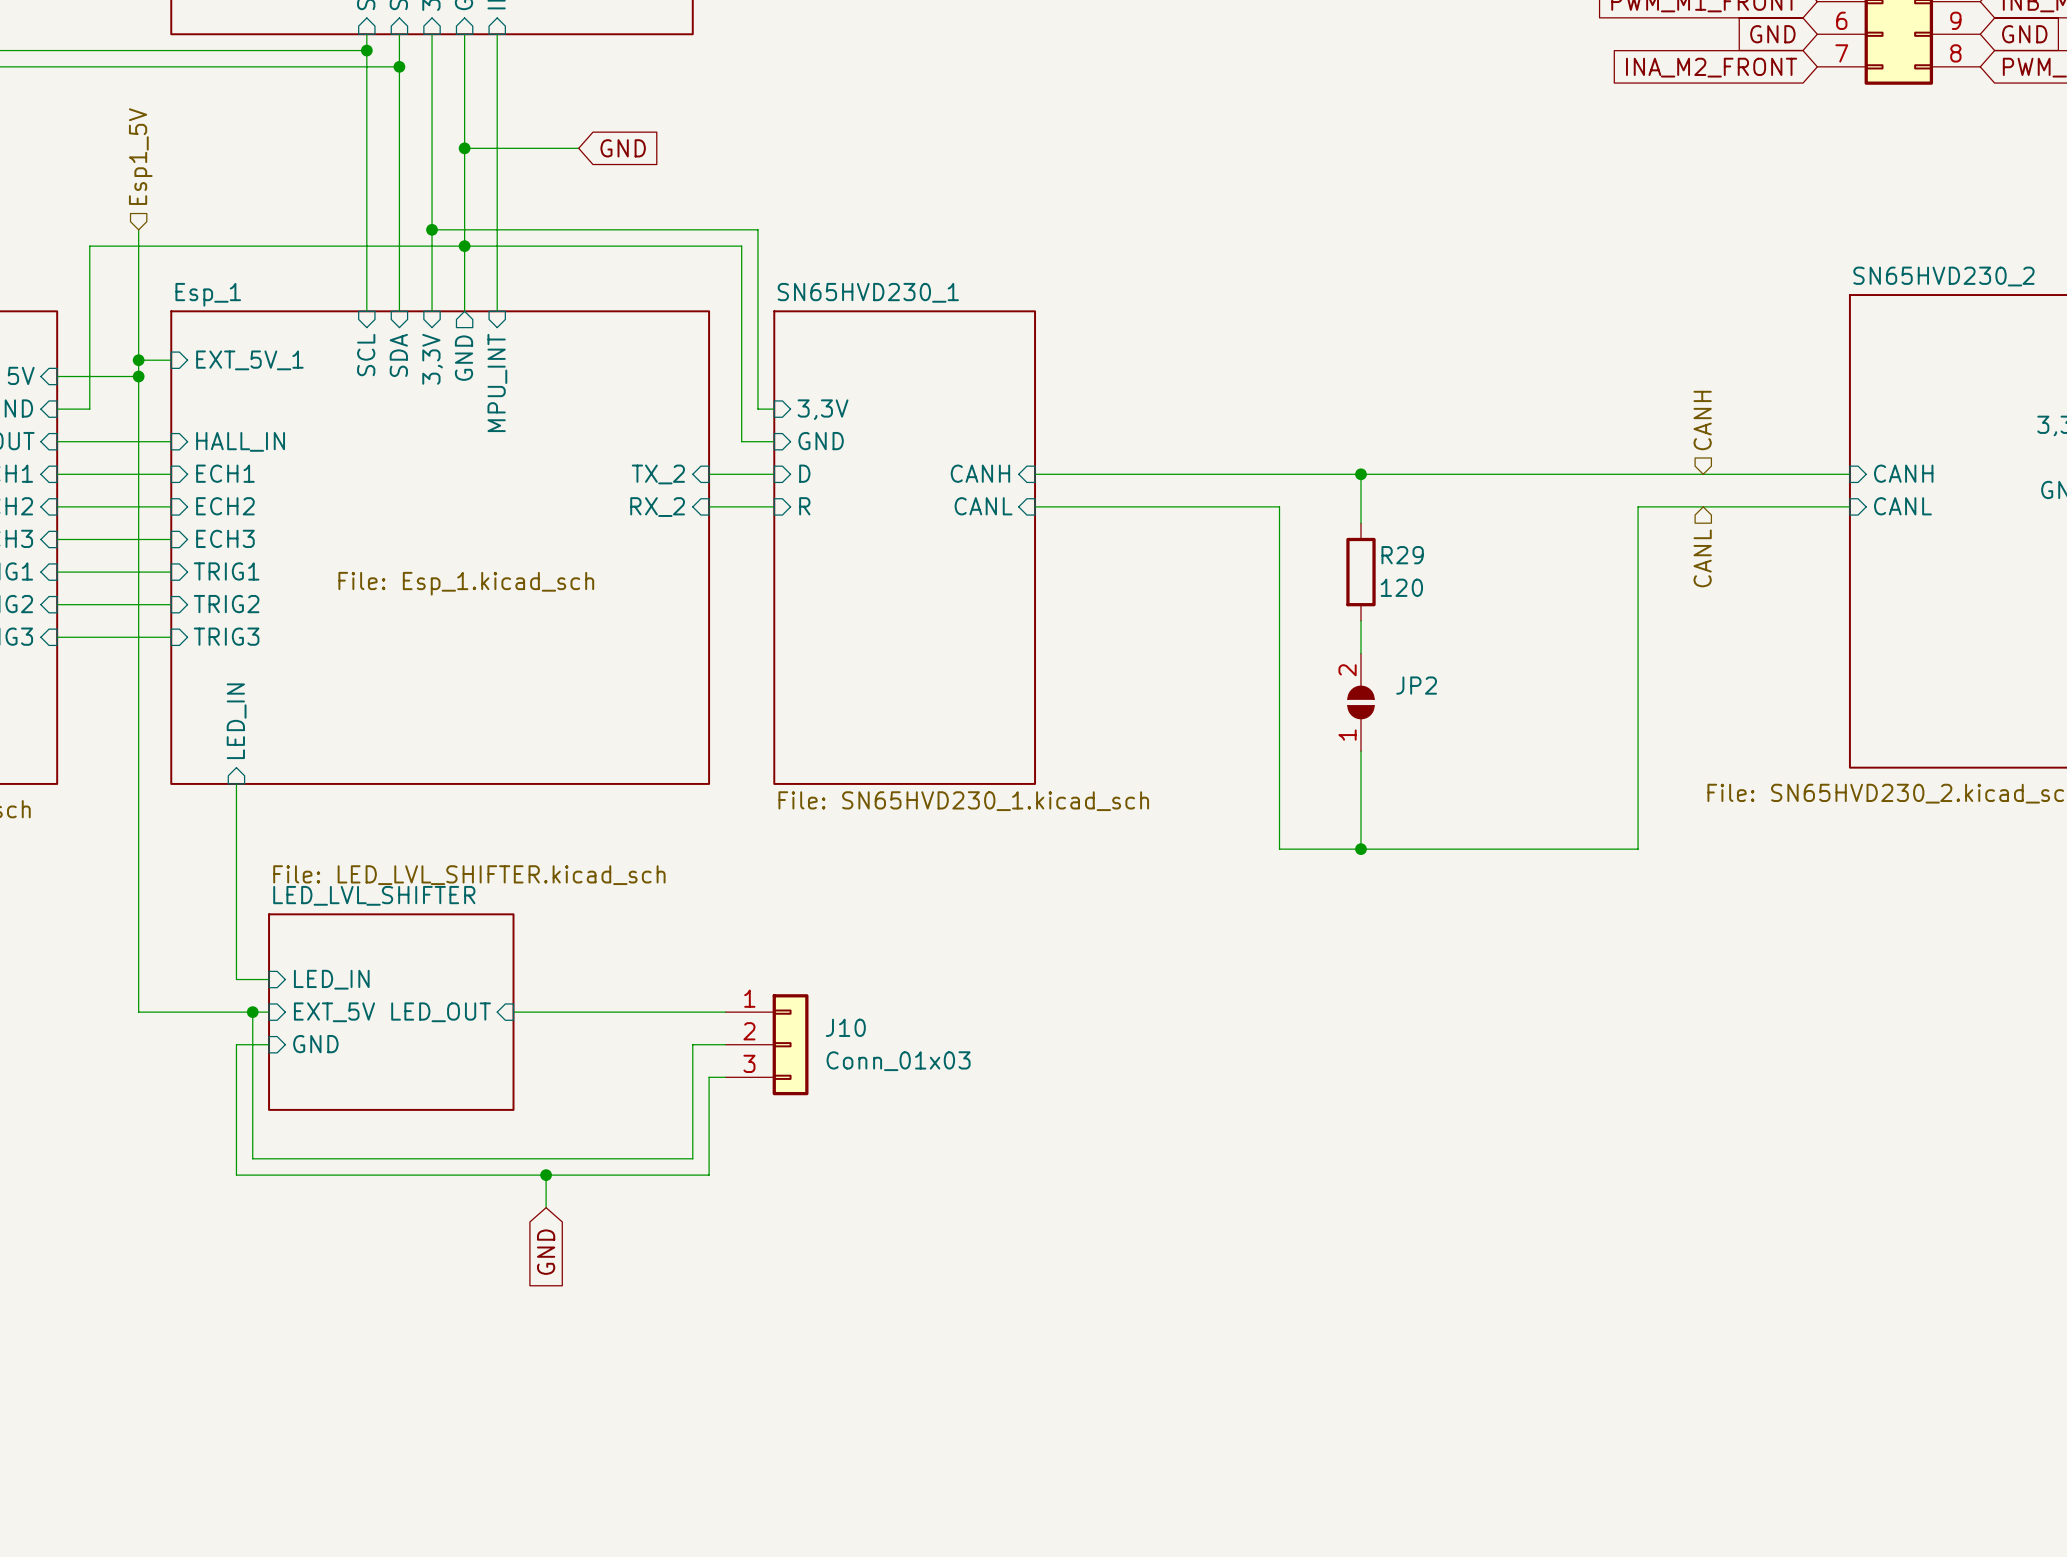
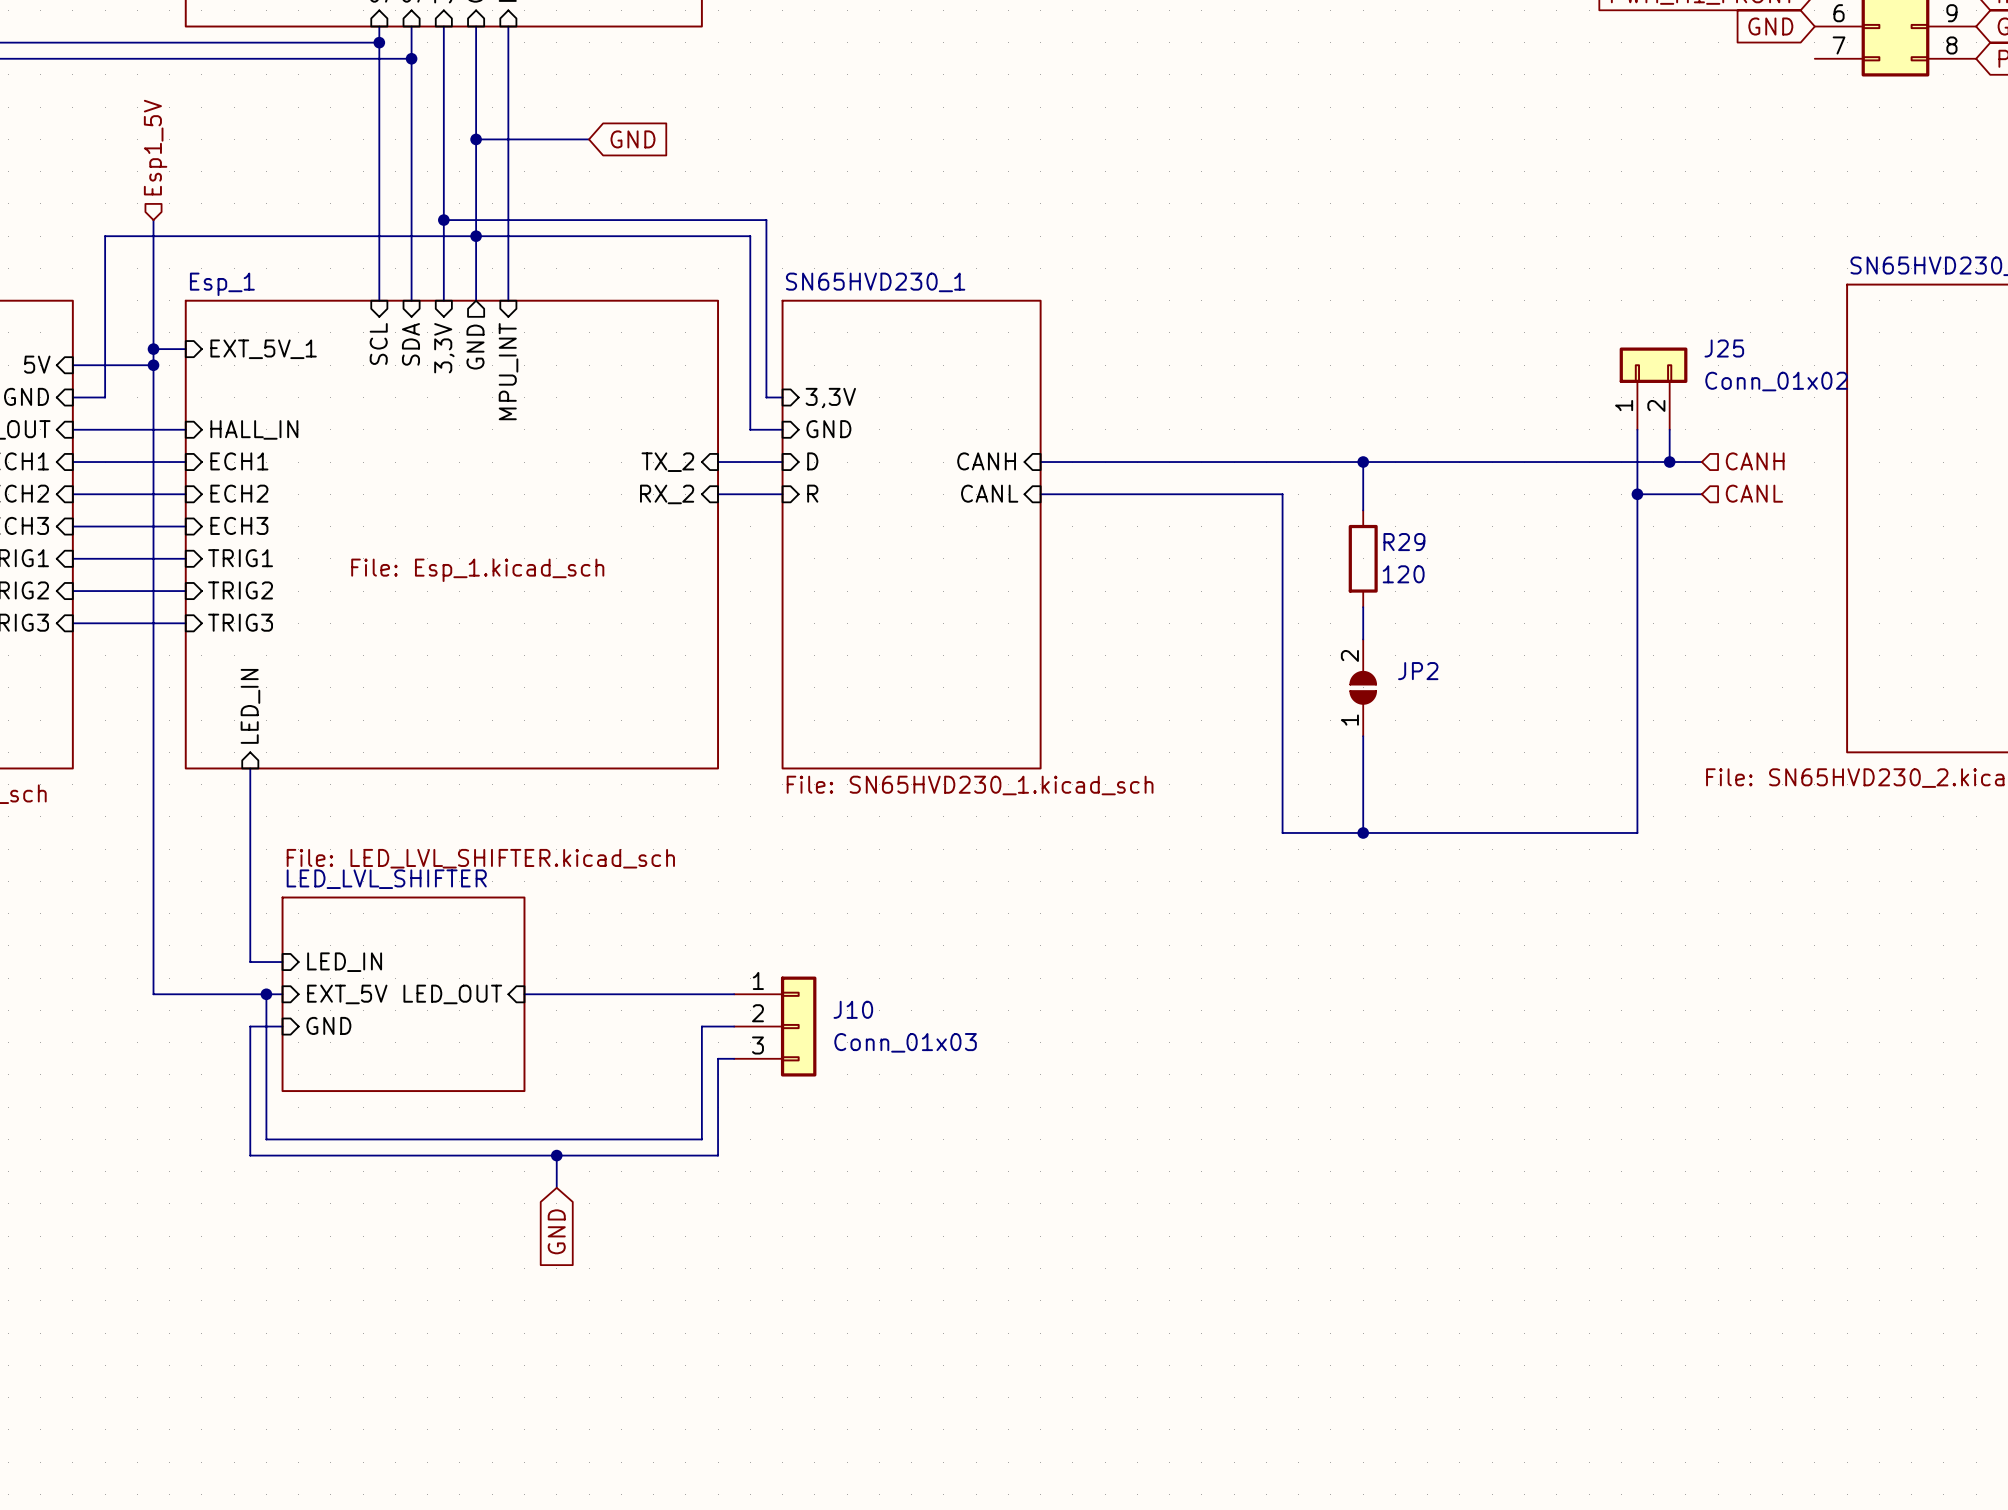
global label: INA_M2_FRONT (1711, 67) -> none
J25: none -> Conn_01x02 (1653, 388)
hierarchical label rotation: 0° (1702, 420) -> 90° clockwise (1755, 461)
hierarchical label position: CANH (1702, 420) -> CANH (1755, 461)
wire: none -> (1637, 429) (1637, 494)
wire: none -> (1669, 429) (1669, 462)
sheet pin: CANH (1903, 473) -> none
junction: none -> (1669, 462)
wire: (1703, 474) (1849, 474) -> none
junction: none -> (1637, 494)
wire: (1703, 506) (1849, 506) -> none
sheet pin: CANL (1902, 506) -> none
hierarchical label rotation: 0° (1702, 558) -> 90° counterclockwise (1754, 493)
hierarchical label position: CANL (1702, 558) -> CANL (1754, 493)

